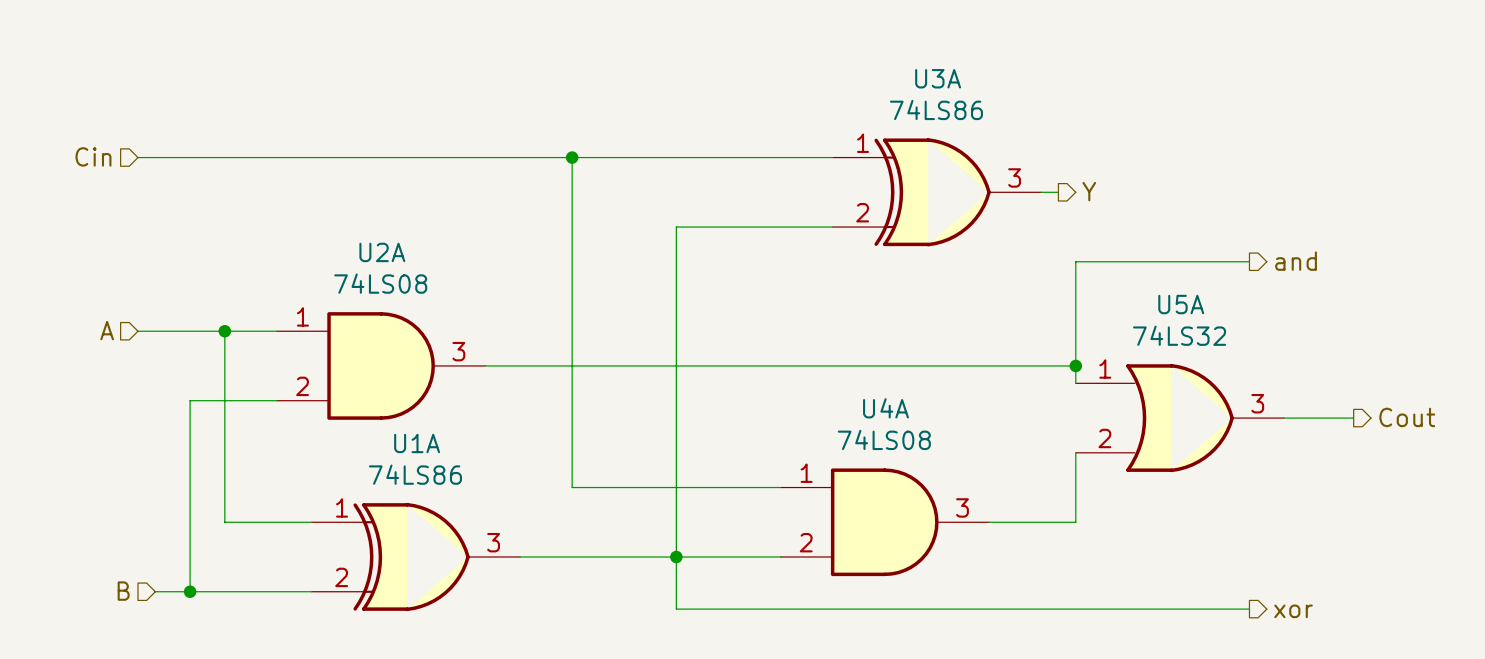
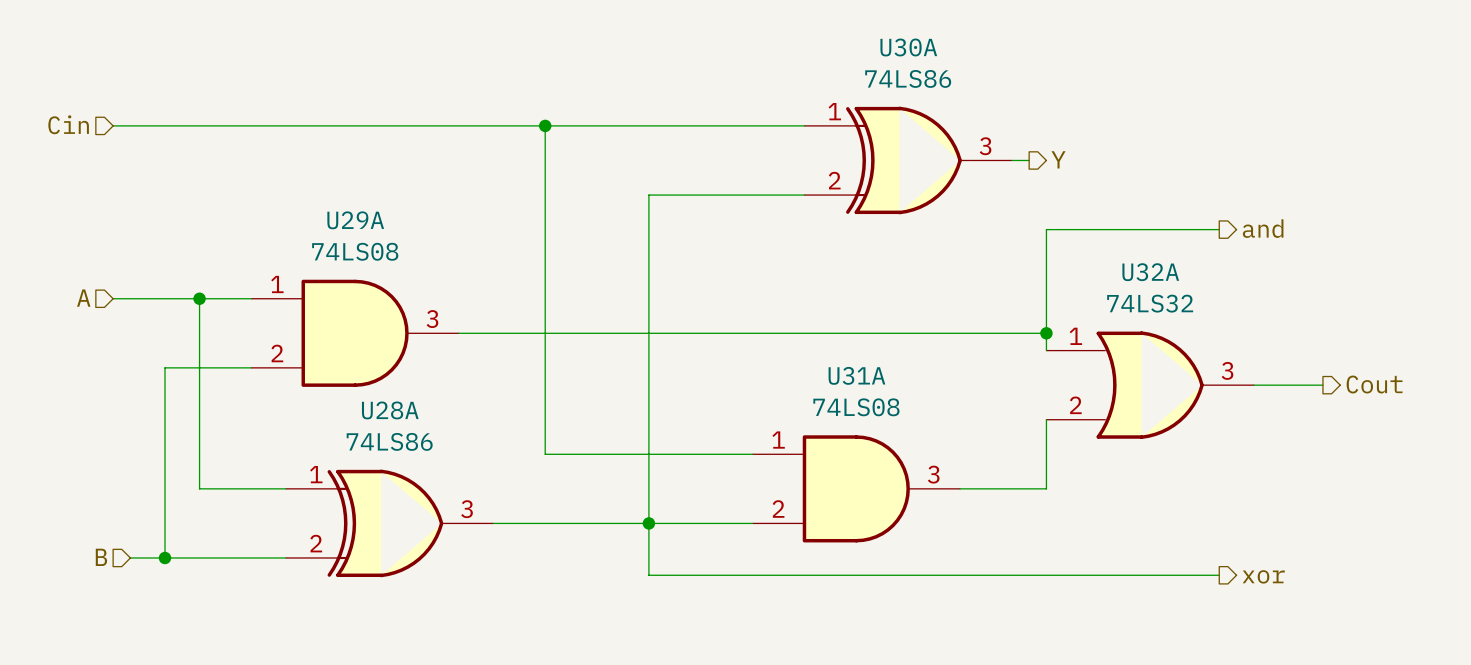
U3A name: U3A (938, 78) -> U30A (908, 47)
U2A name: U2A (382, 252) -> U29A (355, 220)
U5A name: U5A (1181, 304) -> U32A (1150, 272)
U4A name: U4A (886, 408) -> U31A (856, 375)
U1A name: U1A (417, 443) -> U28A (390, 410)

